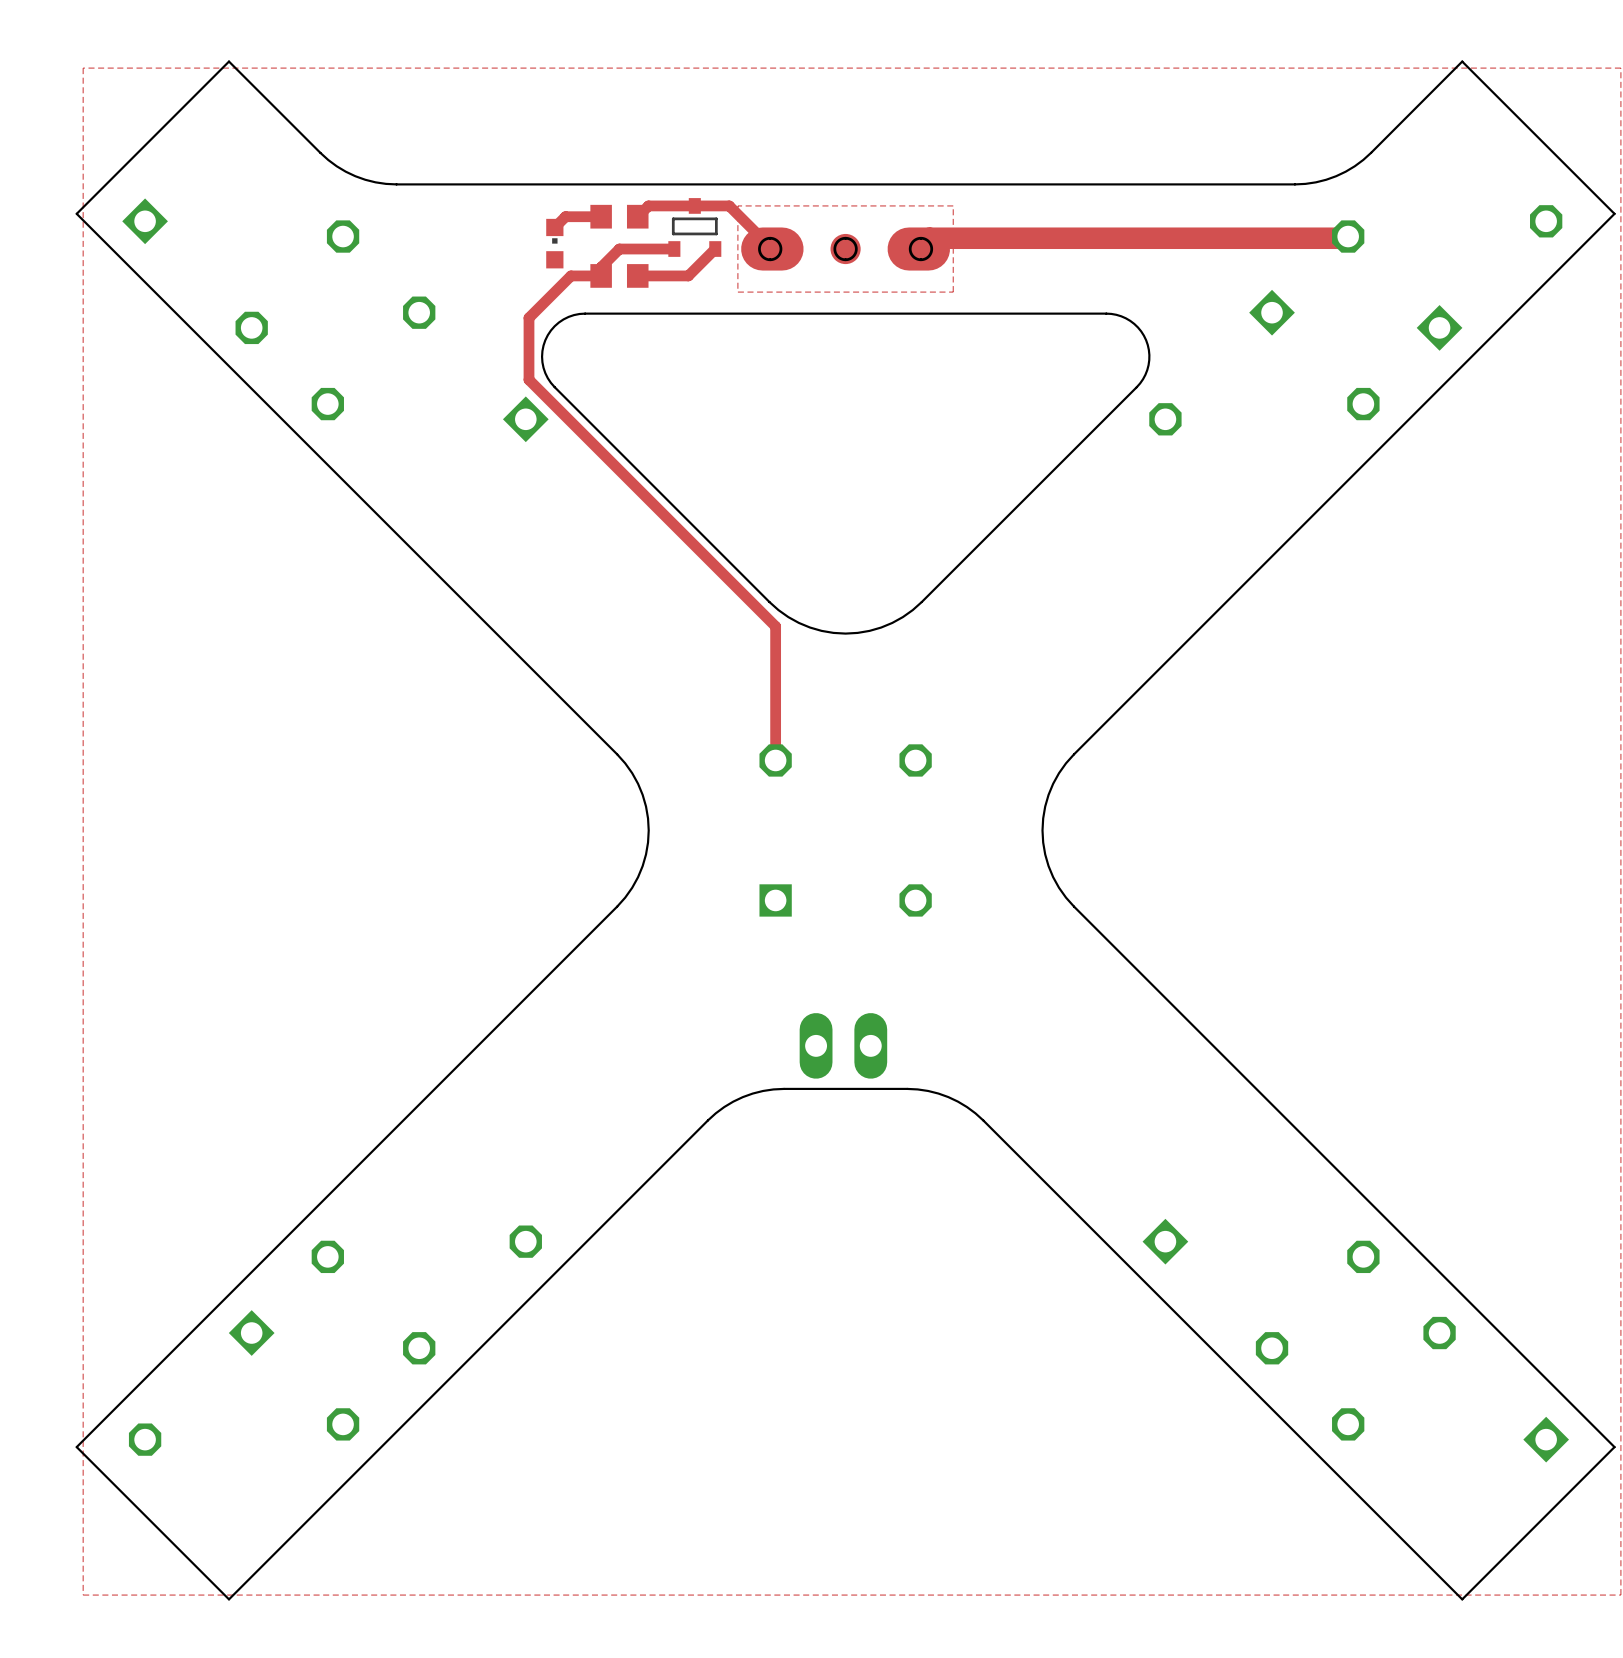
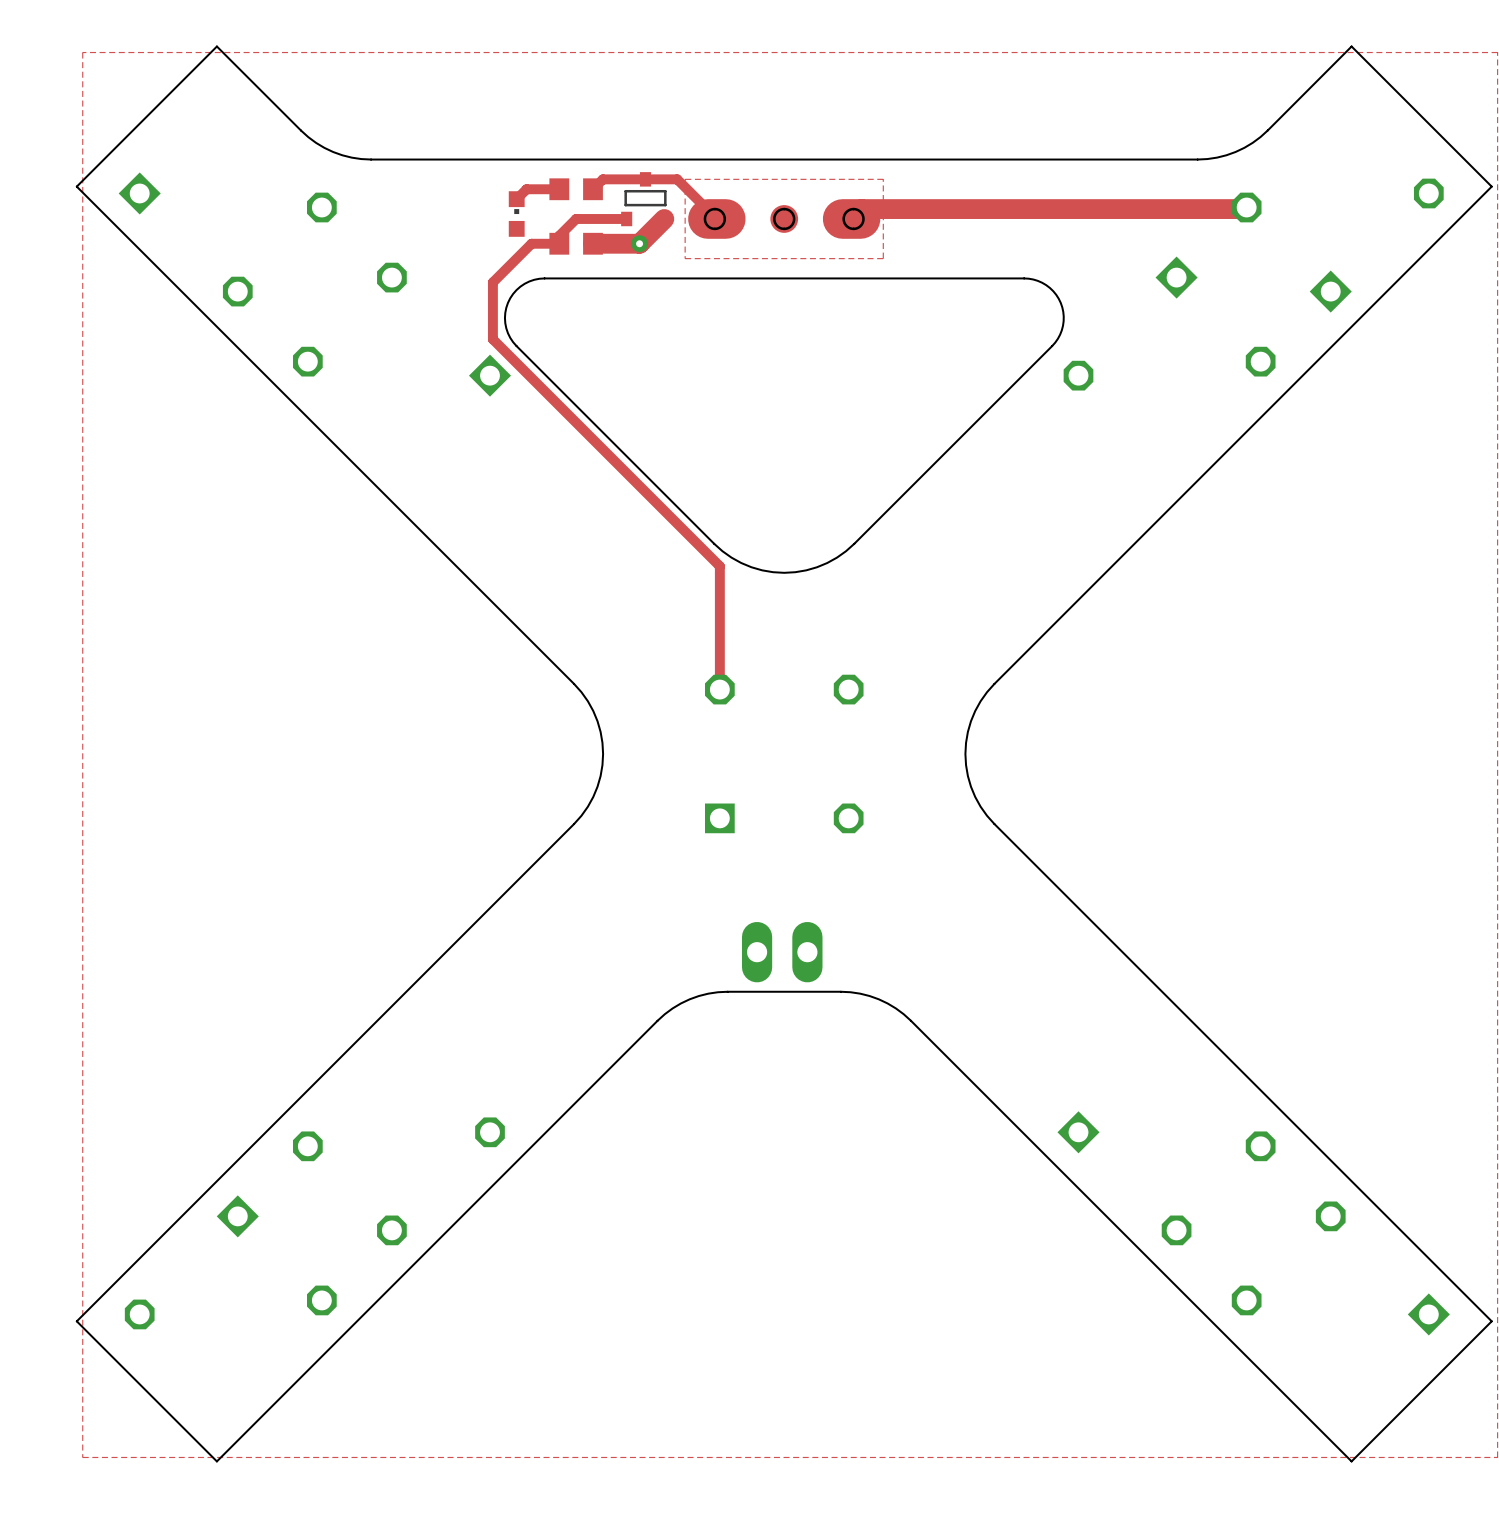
track width: thin (715, 249) (688, 275) (637, 275) -> thick (664, 218) (639, 243) (593, 243)
via: none -> (639, 243)

